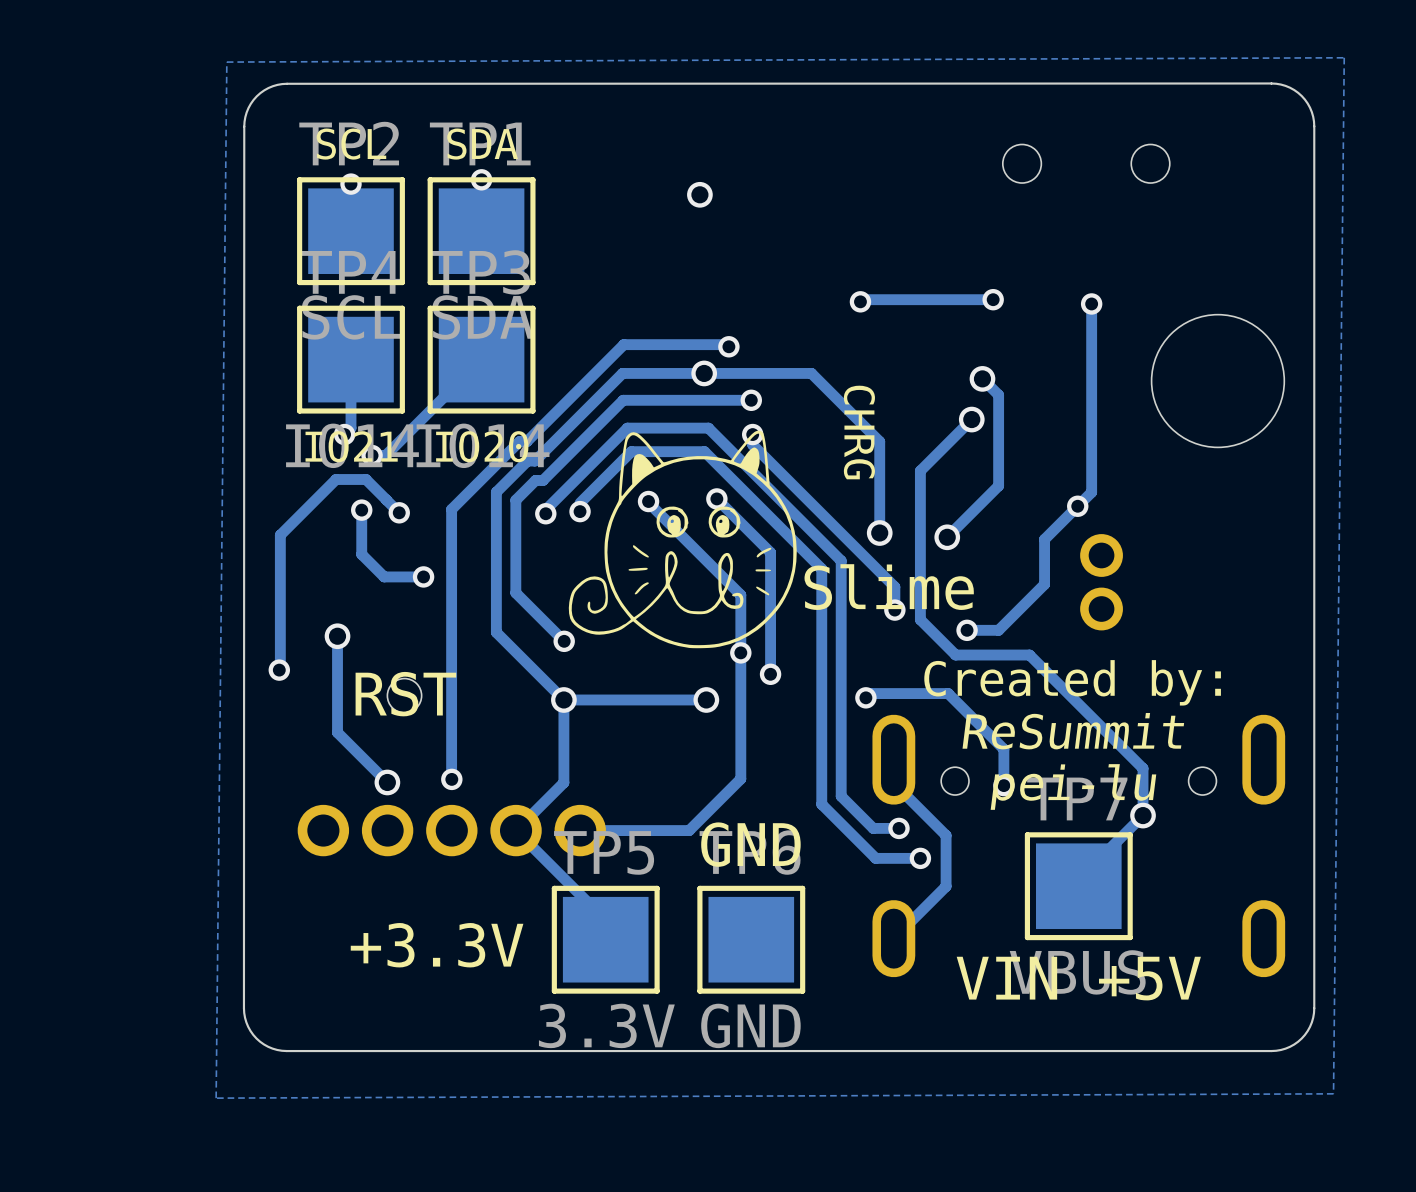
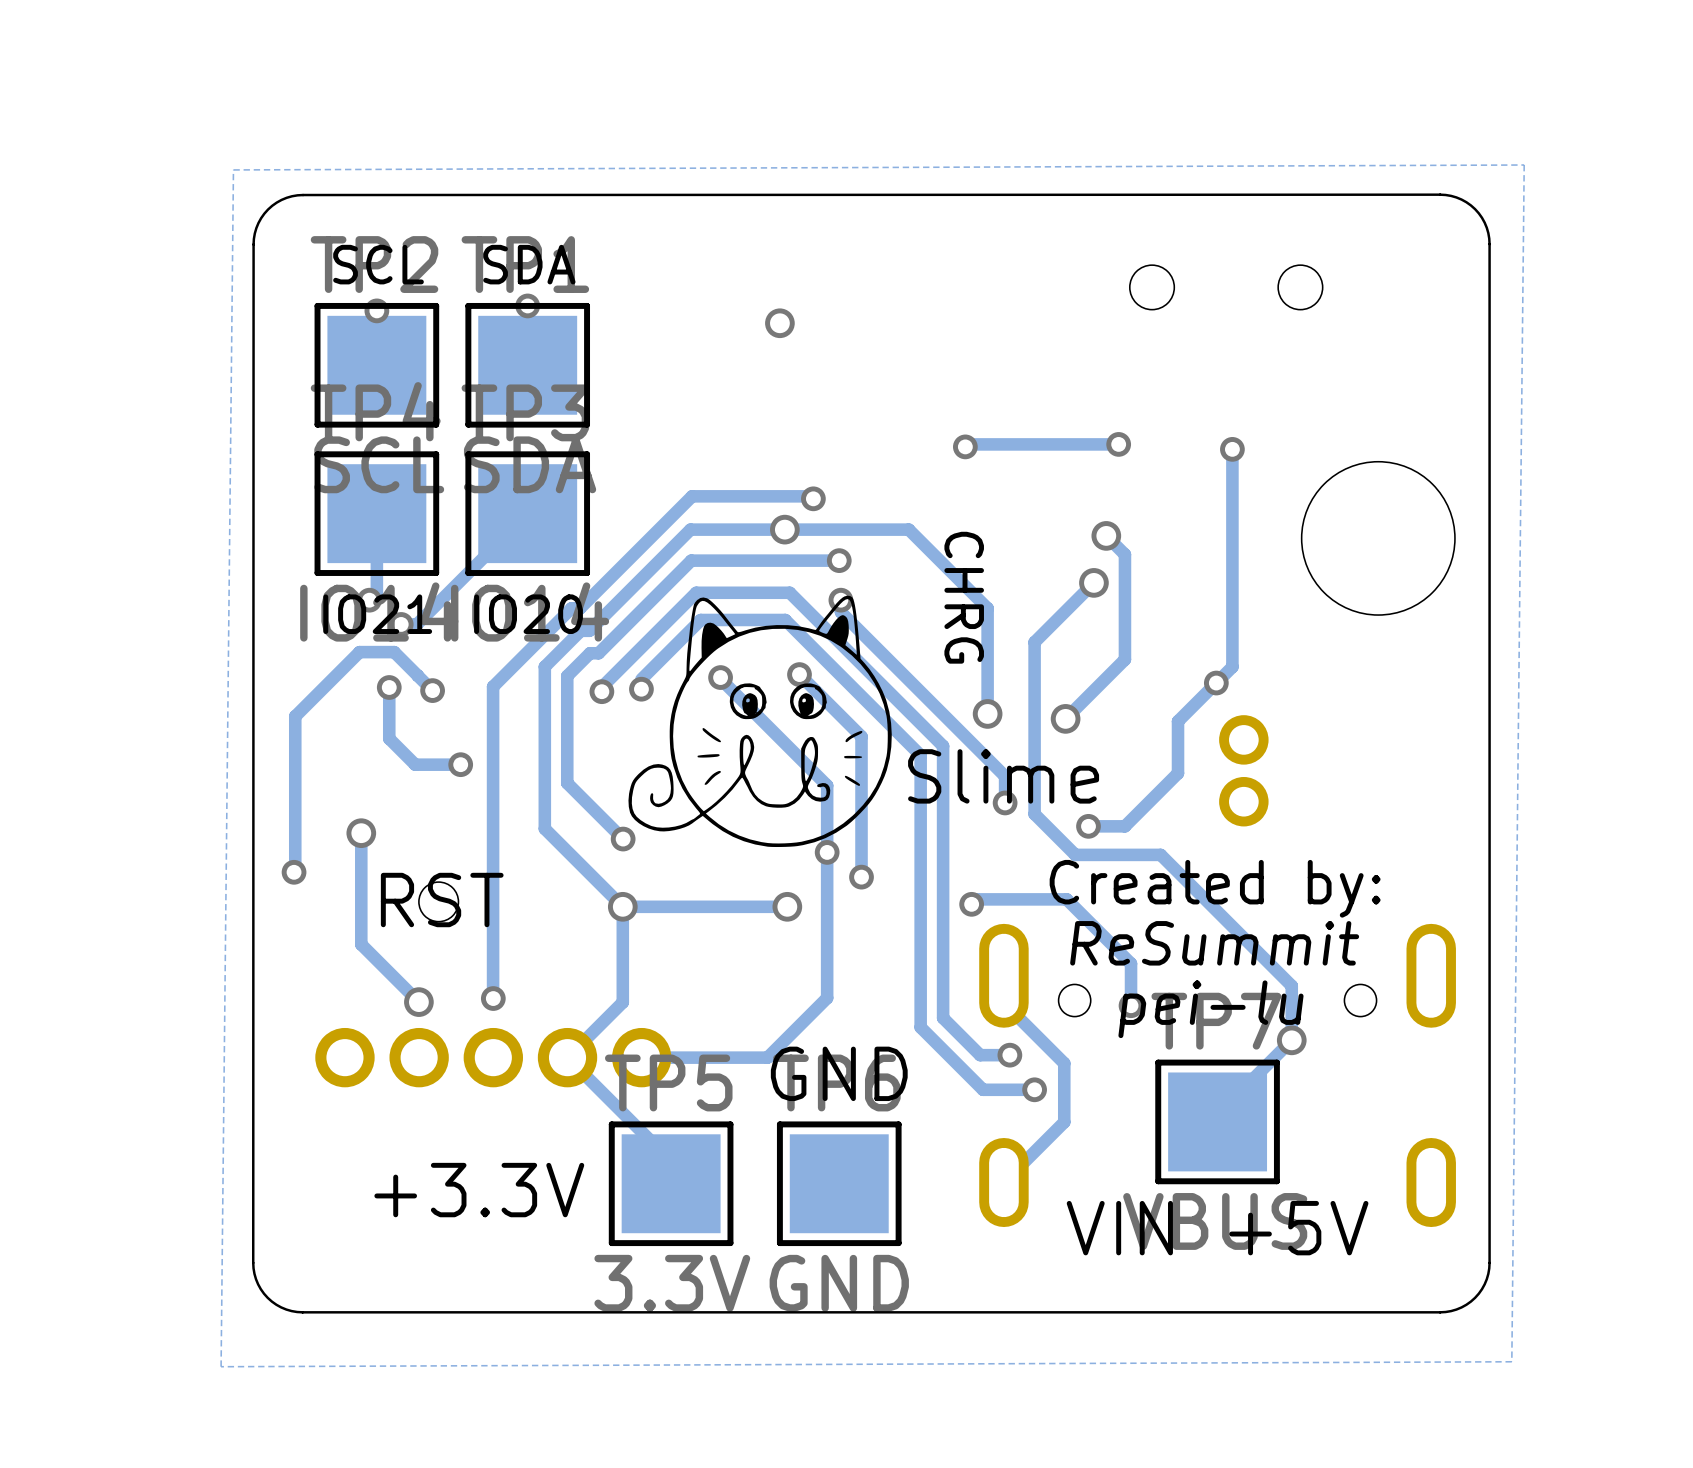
drawing shape: [568, 430, 797, 649] -> [628, 595, 1100, 848]
text: Slime (889, 587) -> none

